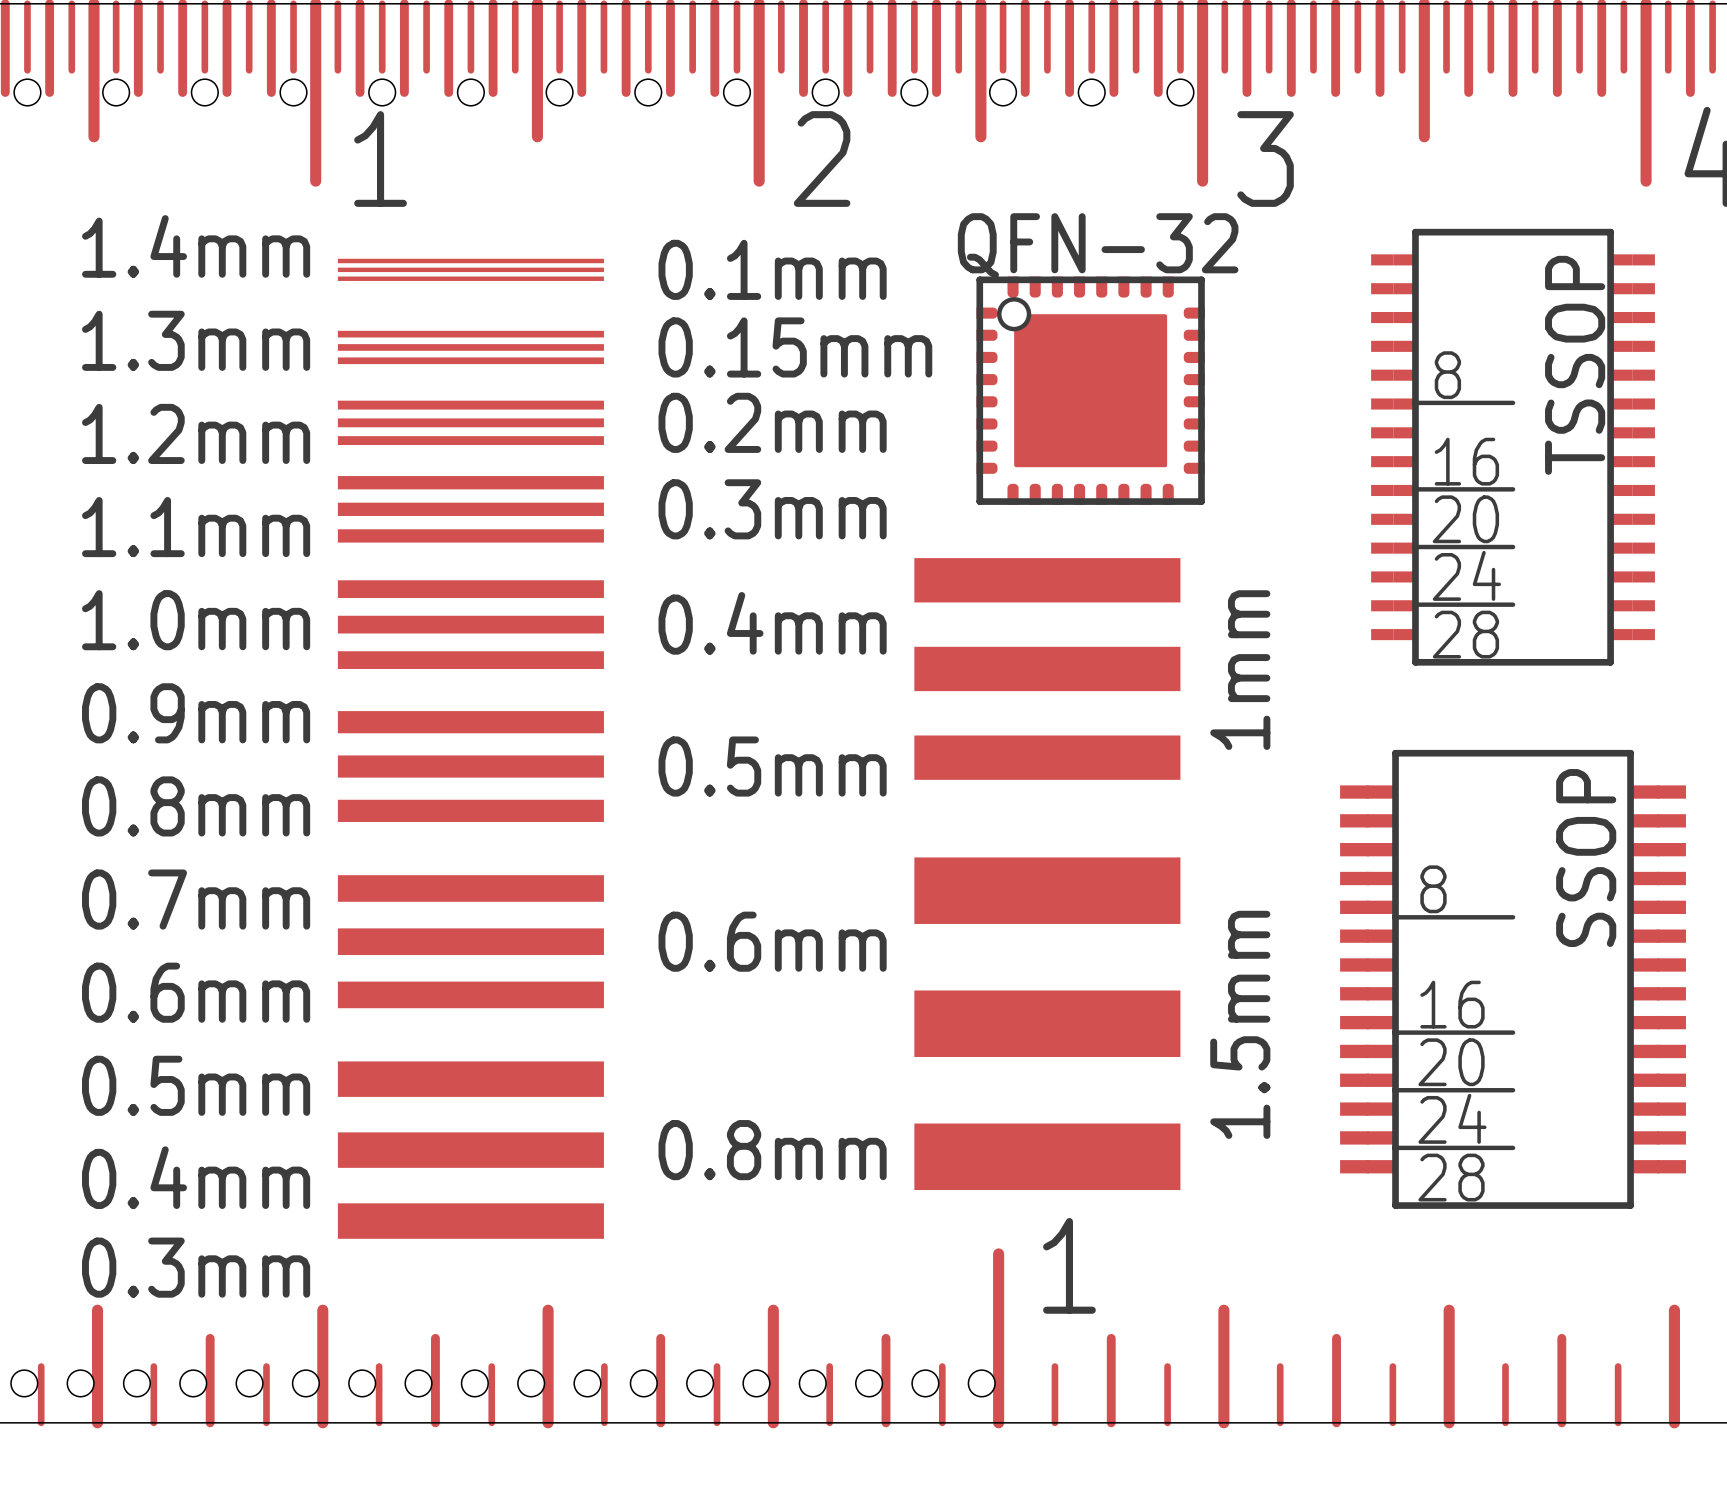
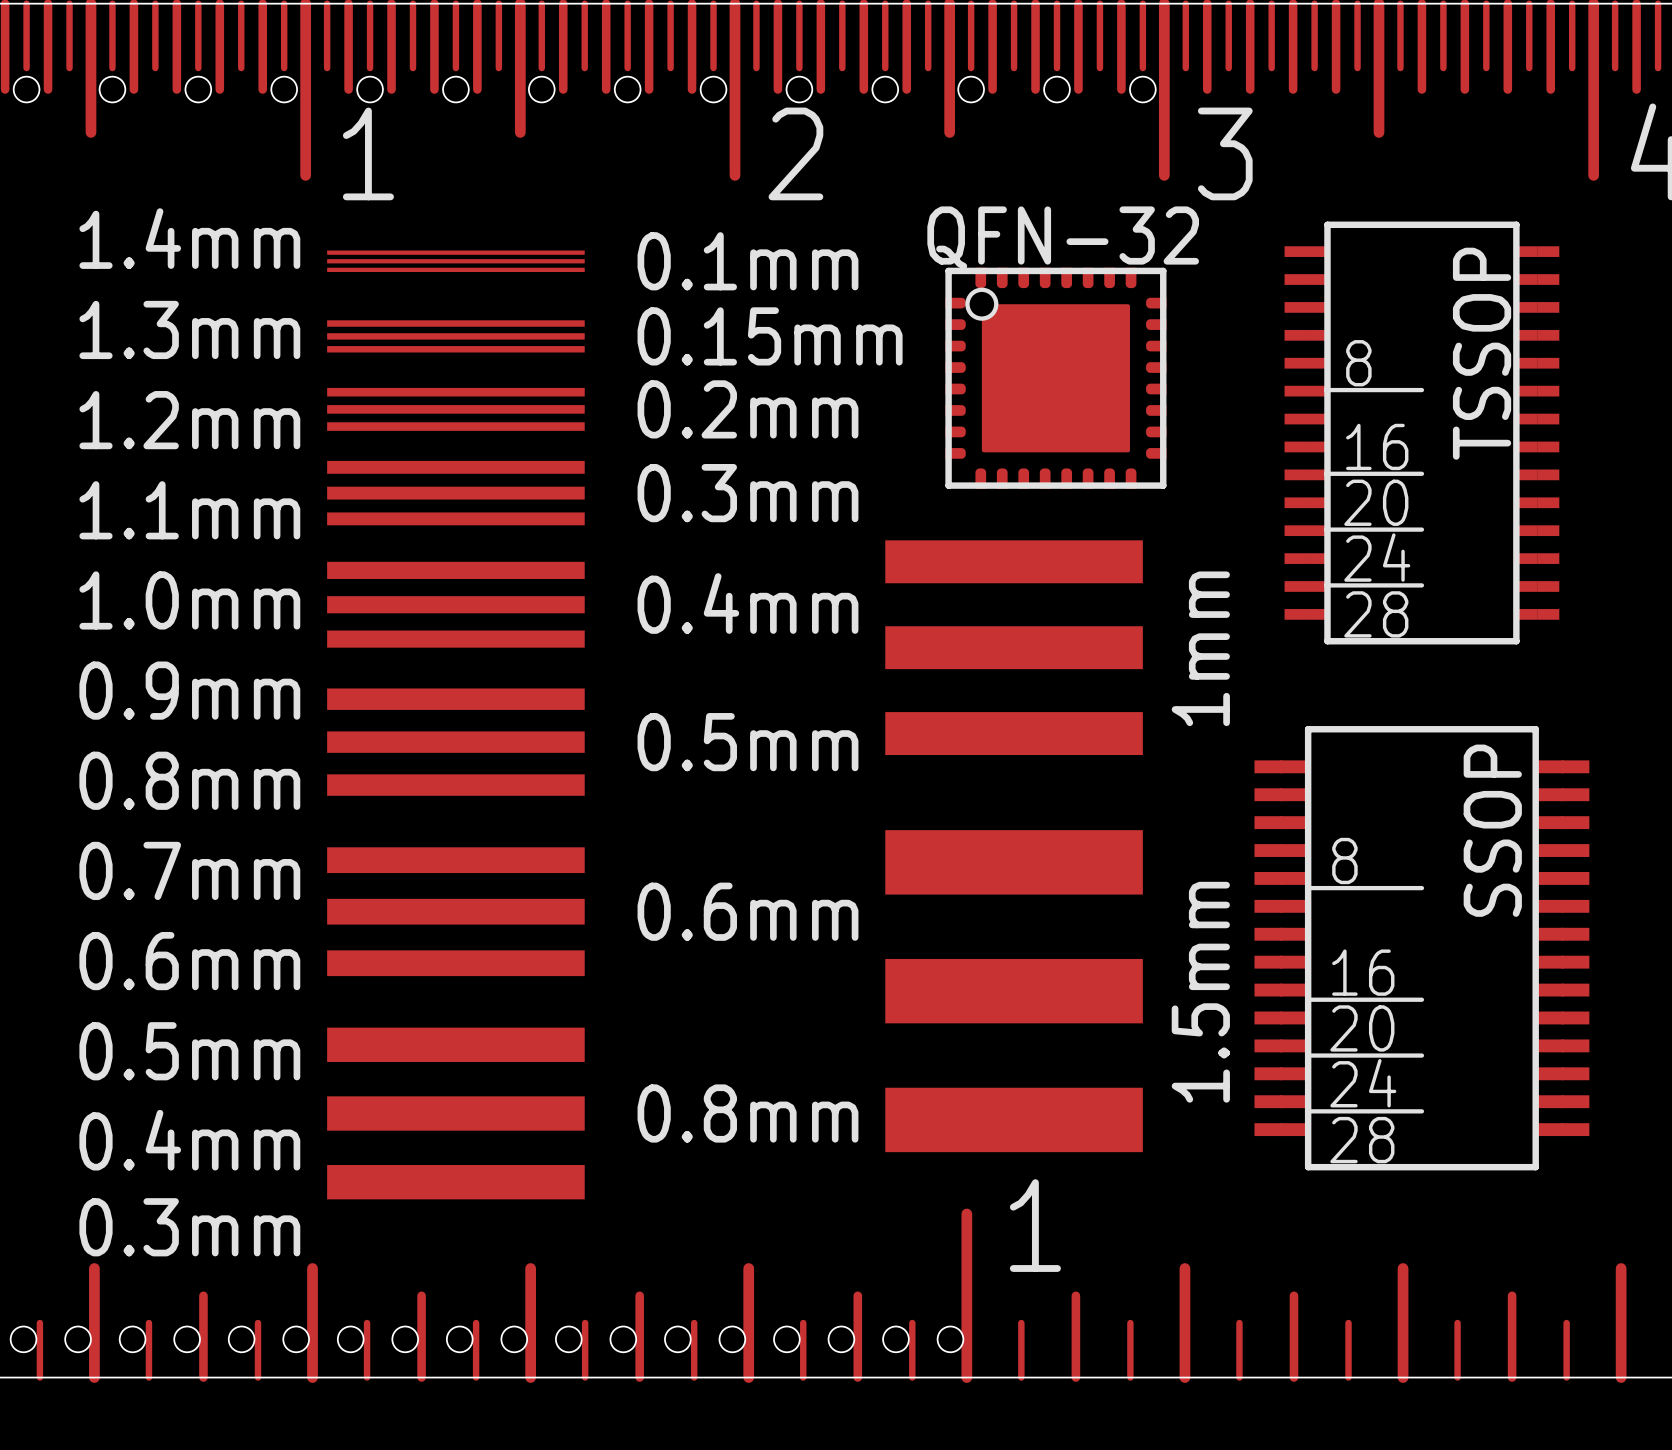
text position: TSSOP (1575, 365) -> TSSOP (1482, 353)
part position: (1513, 447) -> (1421, 433)
text position: SSOP (1586, 858) -> SSOP (1492, 830)
part position: (1513, 979) -> (1421, 948)

